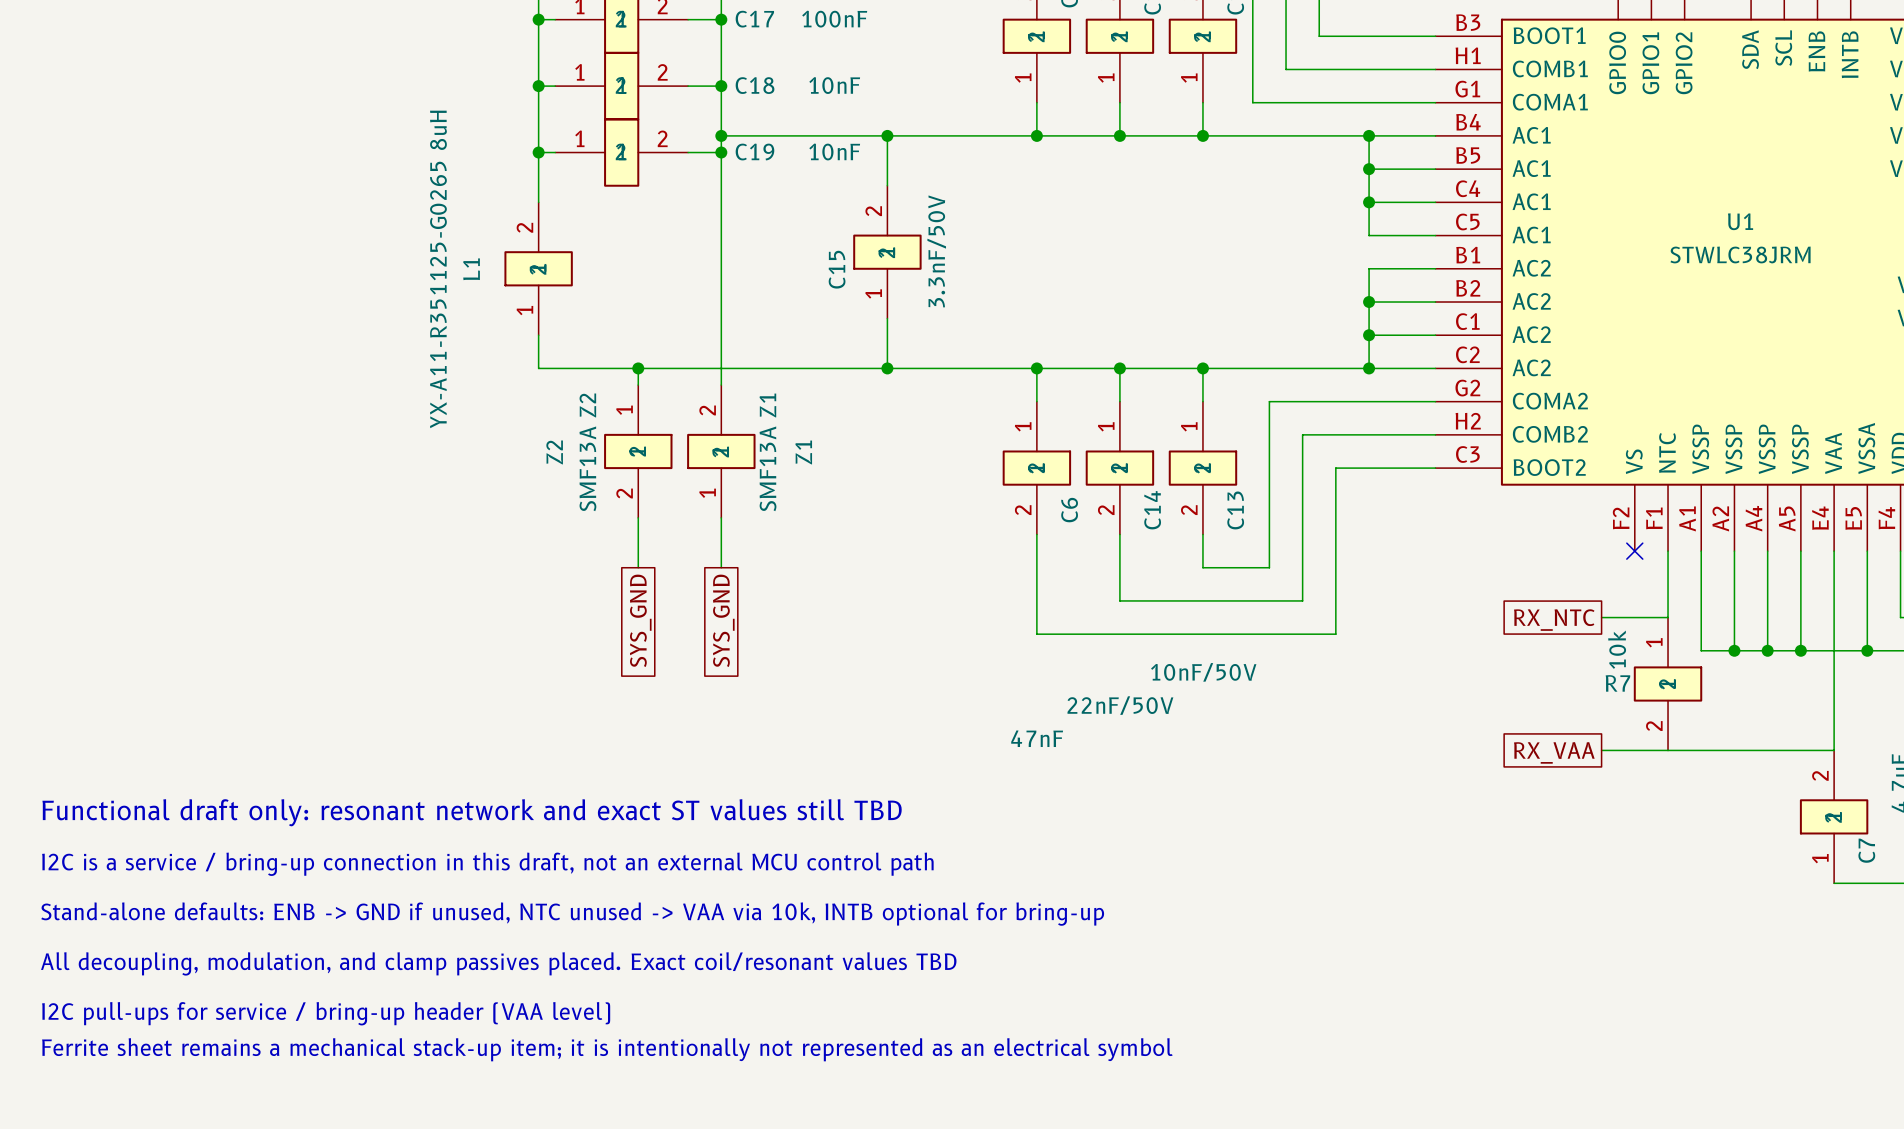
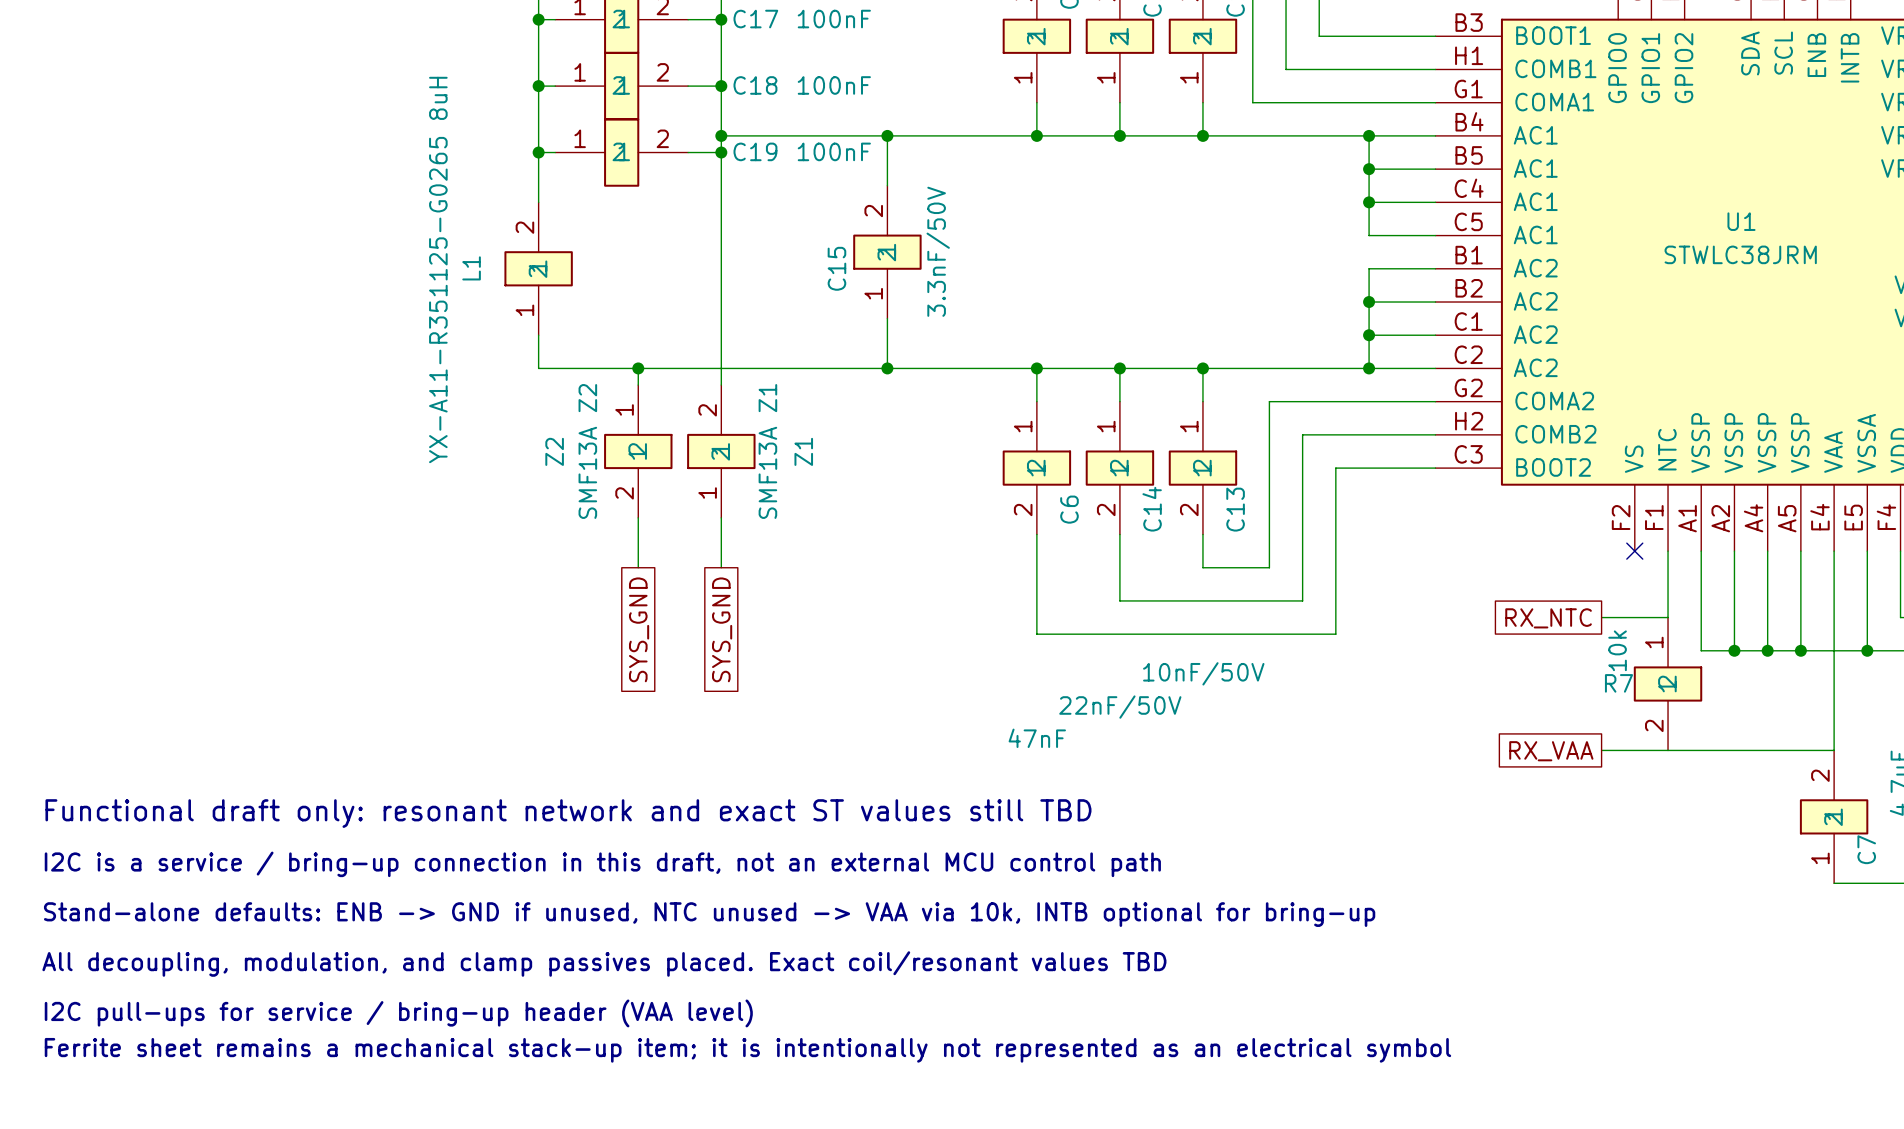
C18 value: 10nF (834, 85) -> 100nF (834, 85)
C19 value: 10nF (834, 152) -> 100nF (834, 151)

